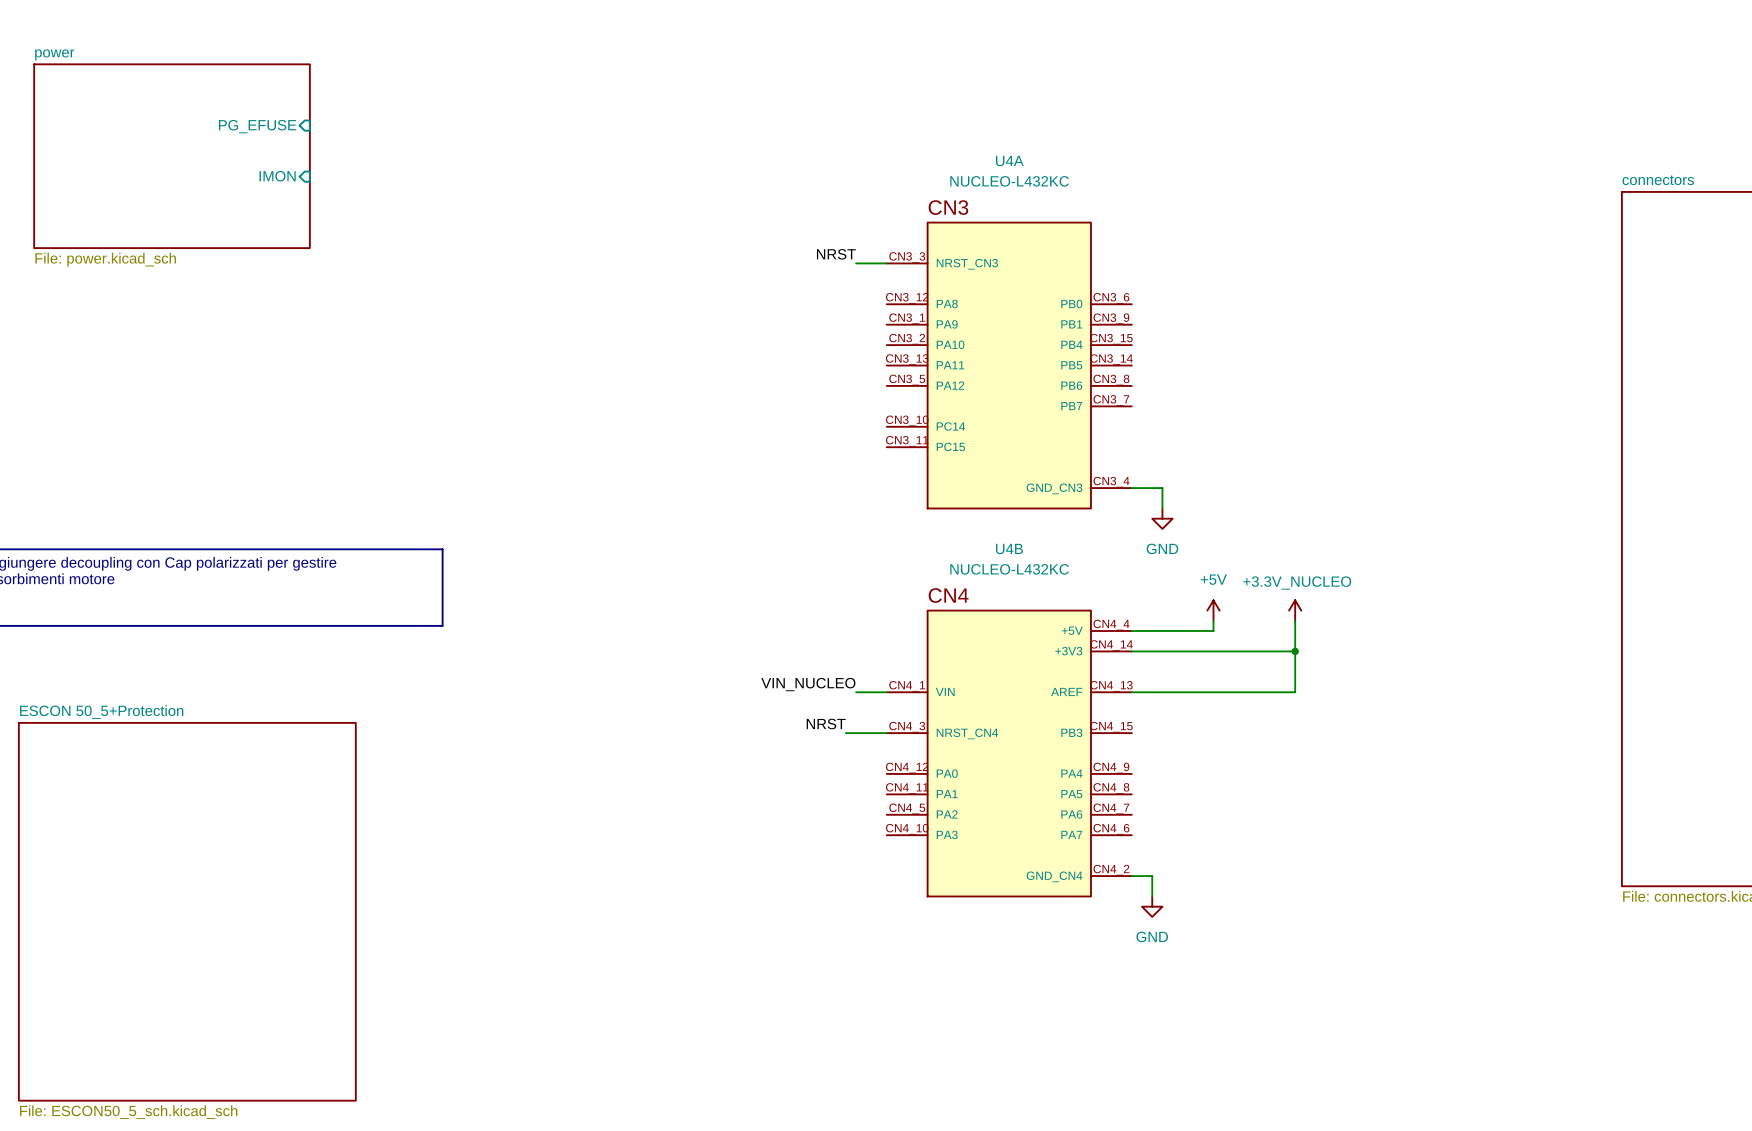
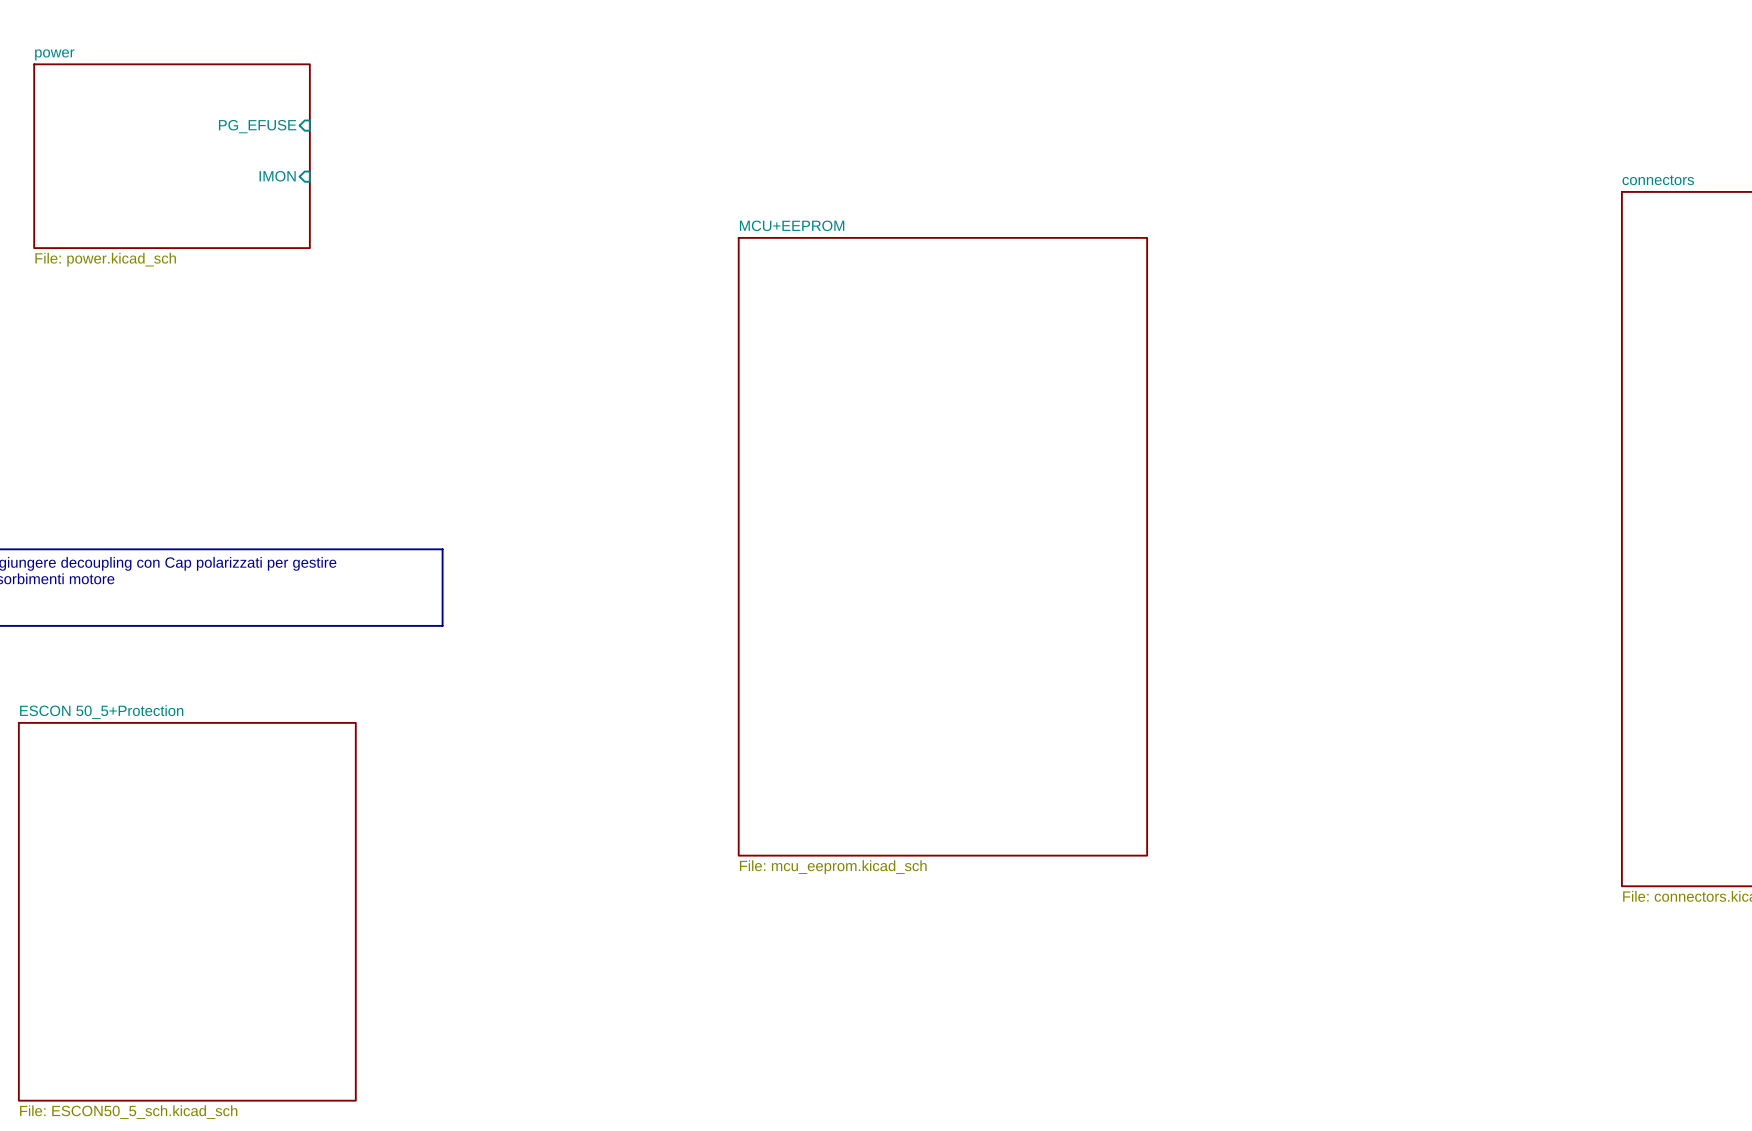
label: NRST (836, 254) -> none
wire: (856, 263) (886, 263) -> none
U4A: NUCLEO-L432KC (1009, 365) -> none
wire: (1131, 488) (1162, 488) (1162, 508) -> none
power symbol: GND (1162, 518) -> none
sheet MCU+EEPROM: none -> File: mcu_eeprom.kicad_sch (942, 546)
power symbol: +5V (1213, 610) -> none
power symbol: +3.3V_NUCLEO (1295, 610) -> none
wire: (1213, 620) (1213, 631) (1131, 631) -> none
wire: (1295, 620) (1295, 692) (1131, 692) -> none
wire: (1131, 651) (1295, 651) -> none
junction: (1295, 651) -> none
label: VIN_NUCLEO (808, 684) -> none
wire: (856, 692) (886, 692) -> none
label: NRST (826, 723) -> none
wire: (845, 733) (886, 733) -> none
U4B: NUCLEO-L432KC (1009, 753) -> none
wire: (1131, 876) (1152, 876) (1152, 896) -> none
power symbol: GND (1152, 906) -> none

